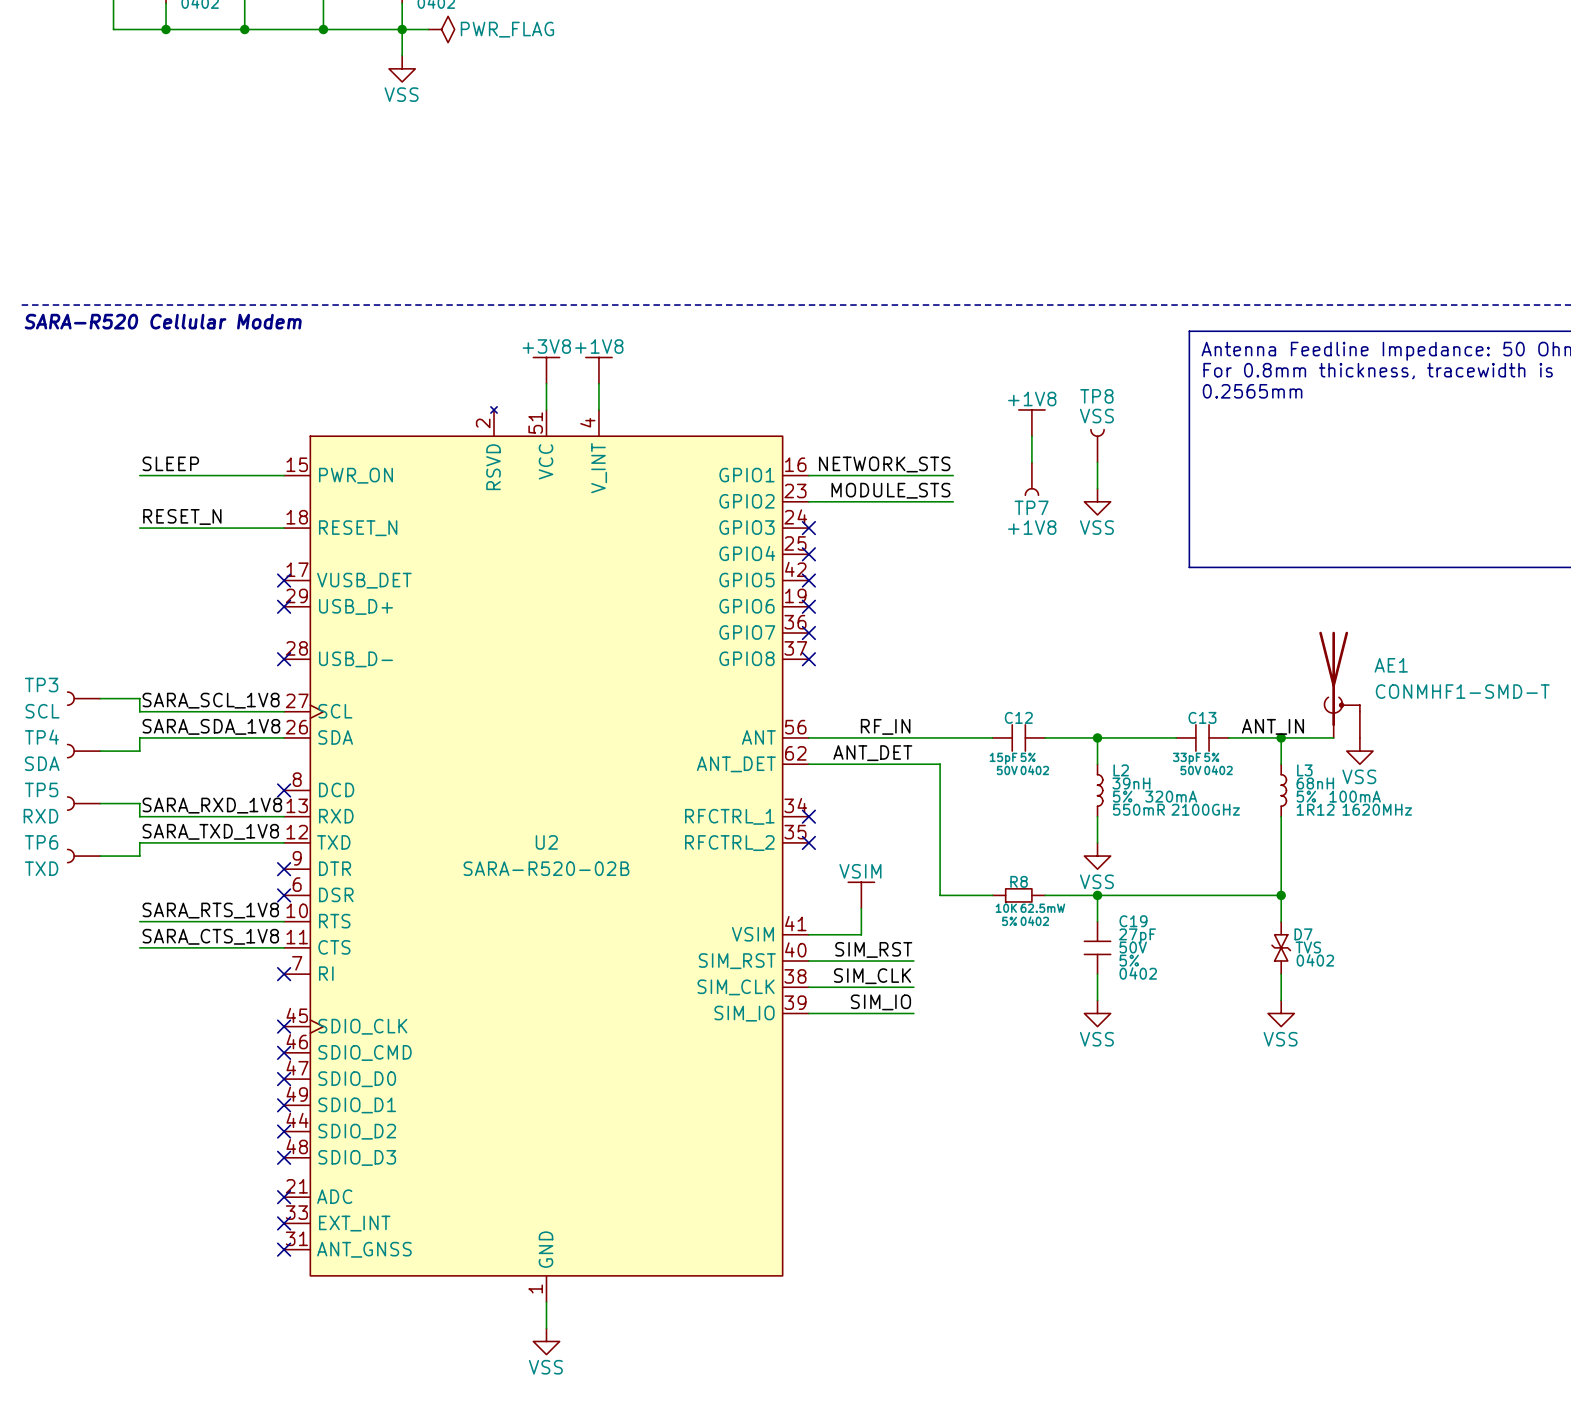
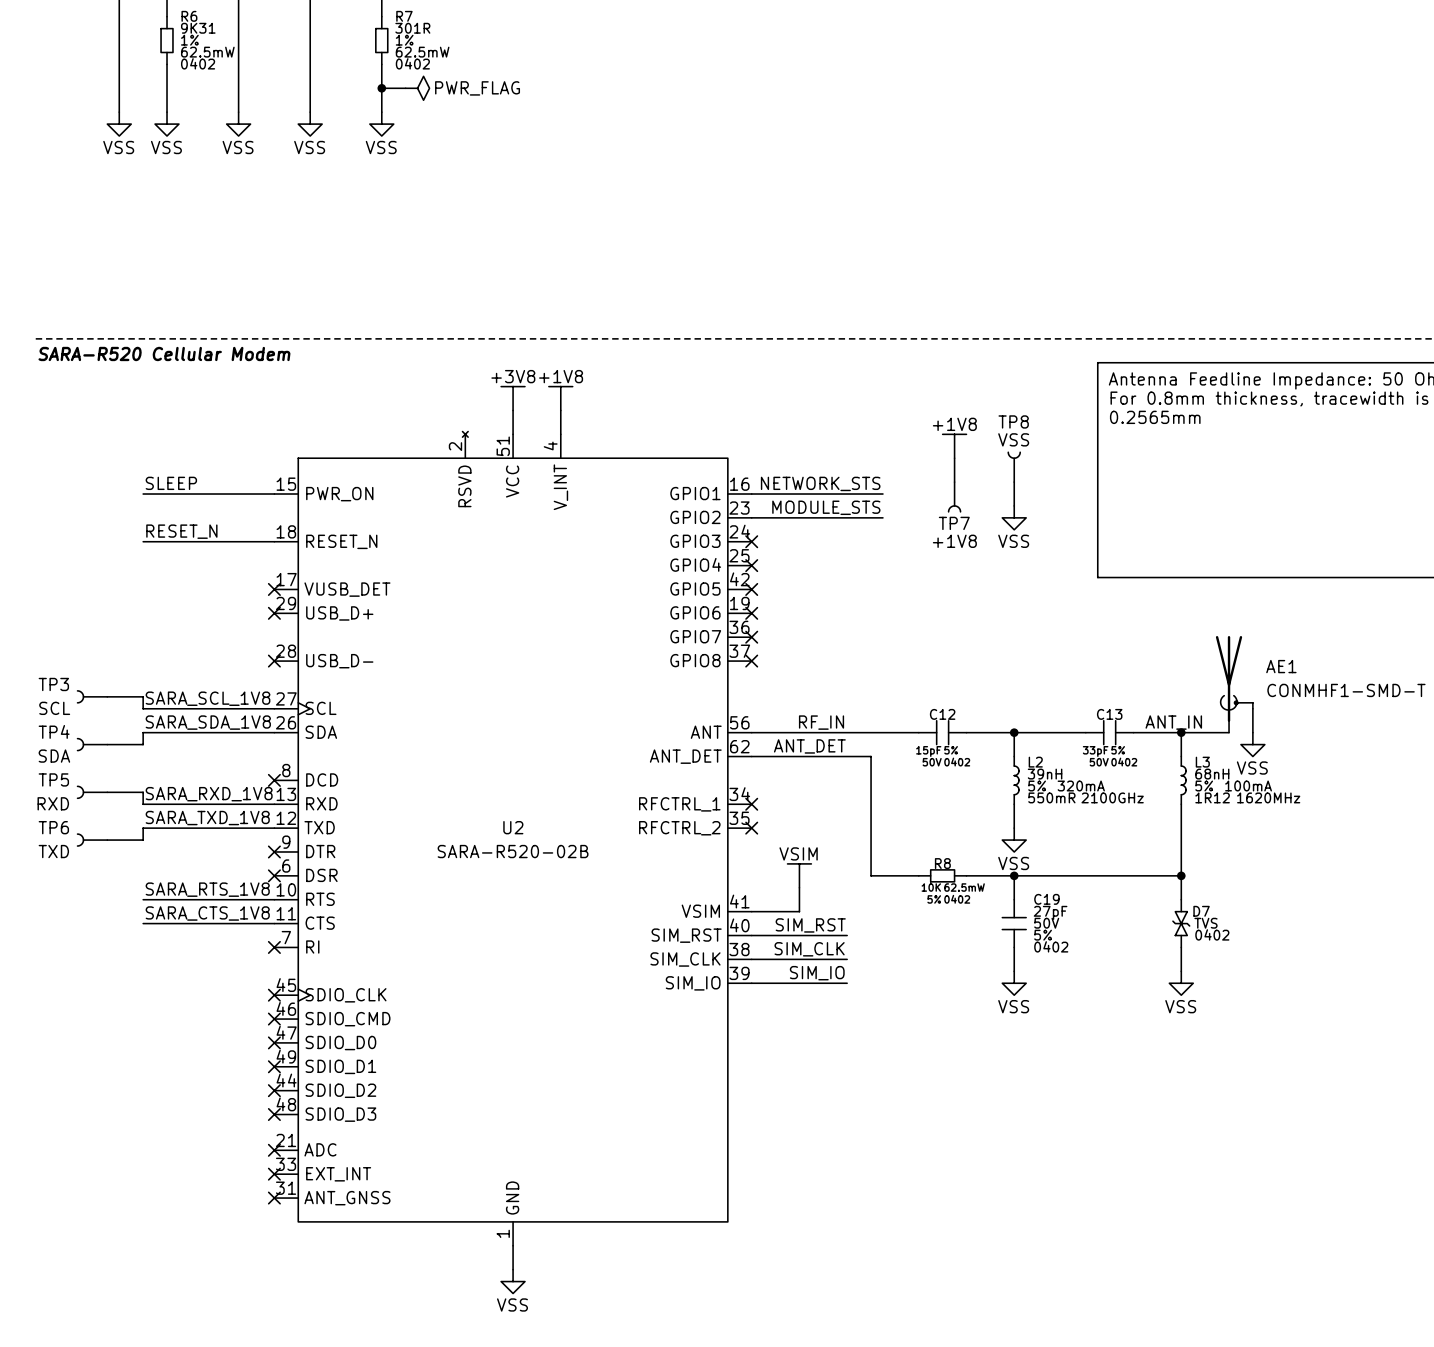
wire: (113, 29) (402, 29) -> (119, 88) (119, 112)
wire: none -> (167, 88) (167, 112)
junction: (166, 29) -> none
wire: none -> (238, 88) (238, 112)
junction: (244, 29) -> none
wire: none -> (310, 88) (310, 112)
junction: (323, 29) -> none
power symbol: none -> VSS (119, 124)
power symbol: none -> VSS (167, 124)
power symbol: none -> VSS (238, 124)
power symbol: none -> VSS (310, 124)

